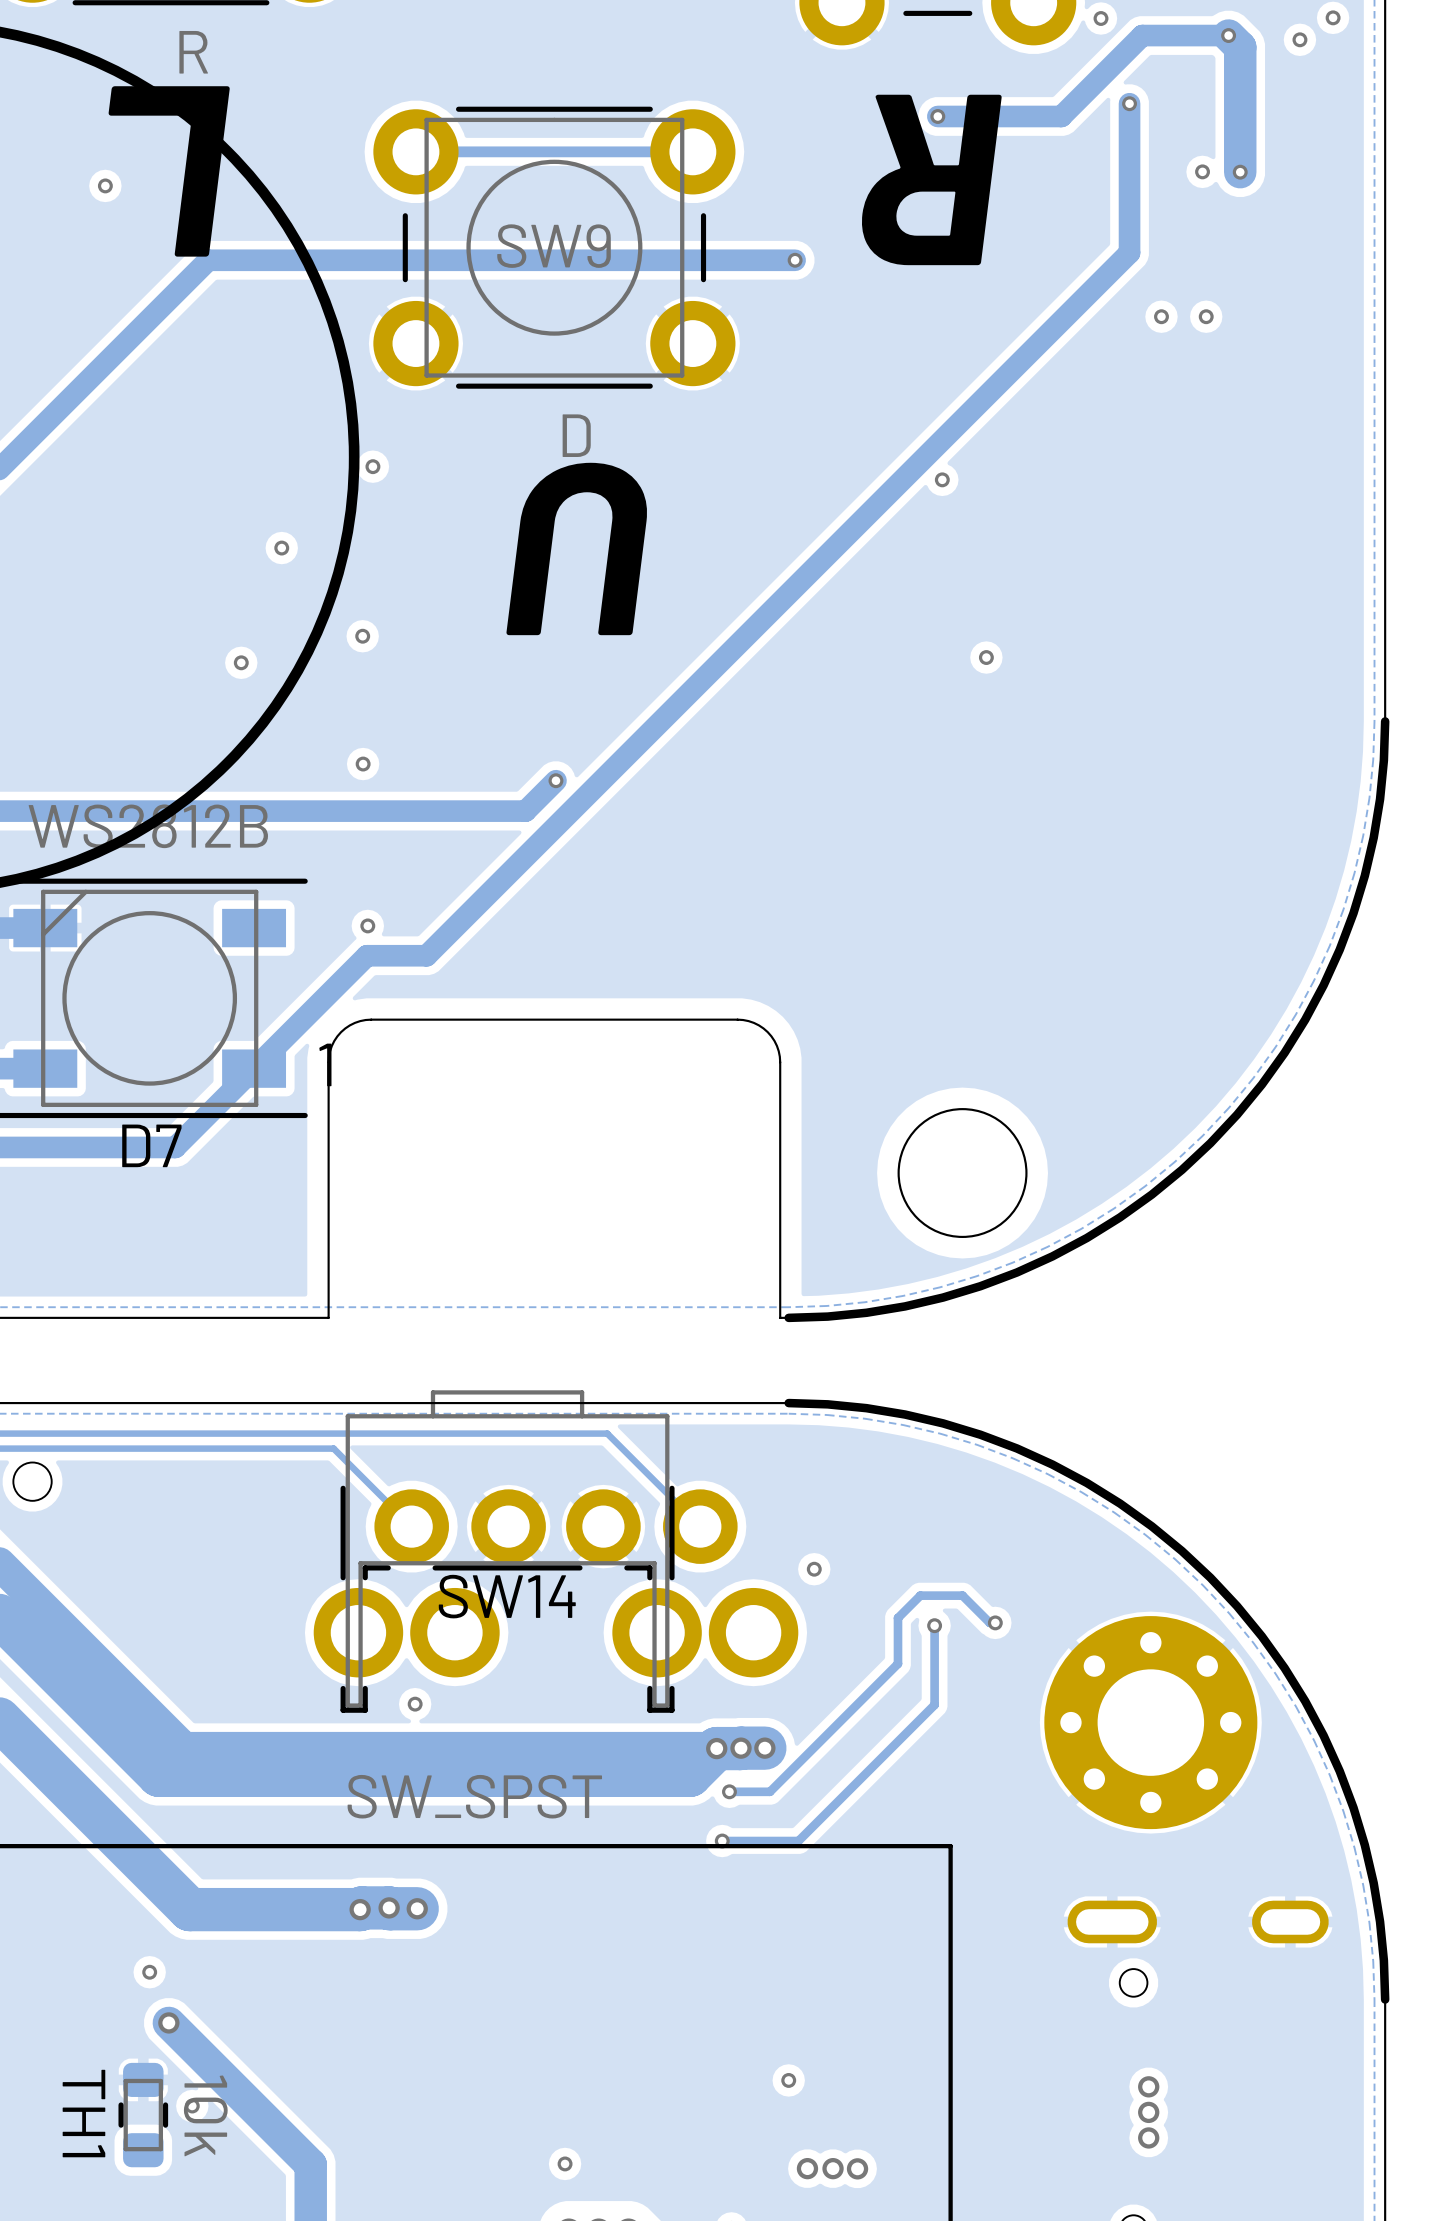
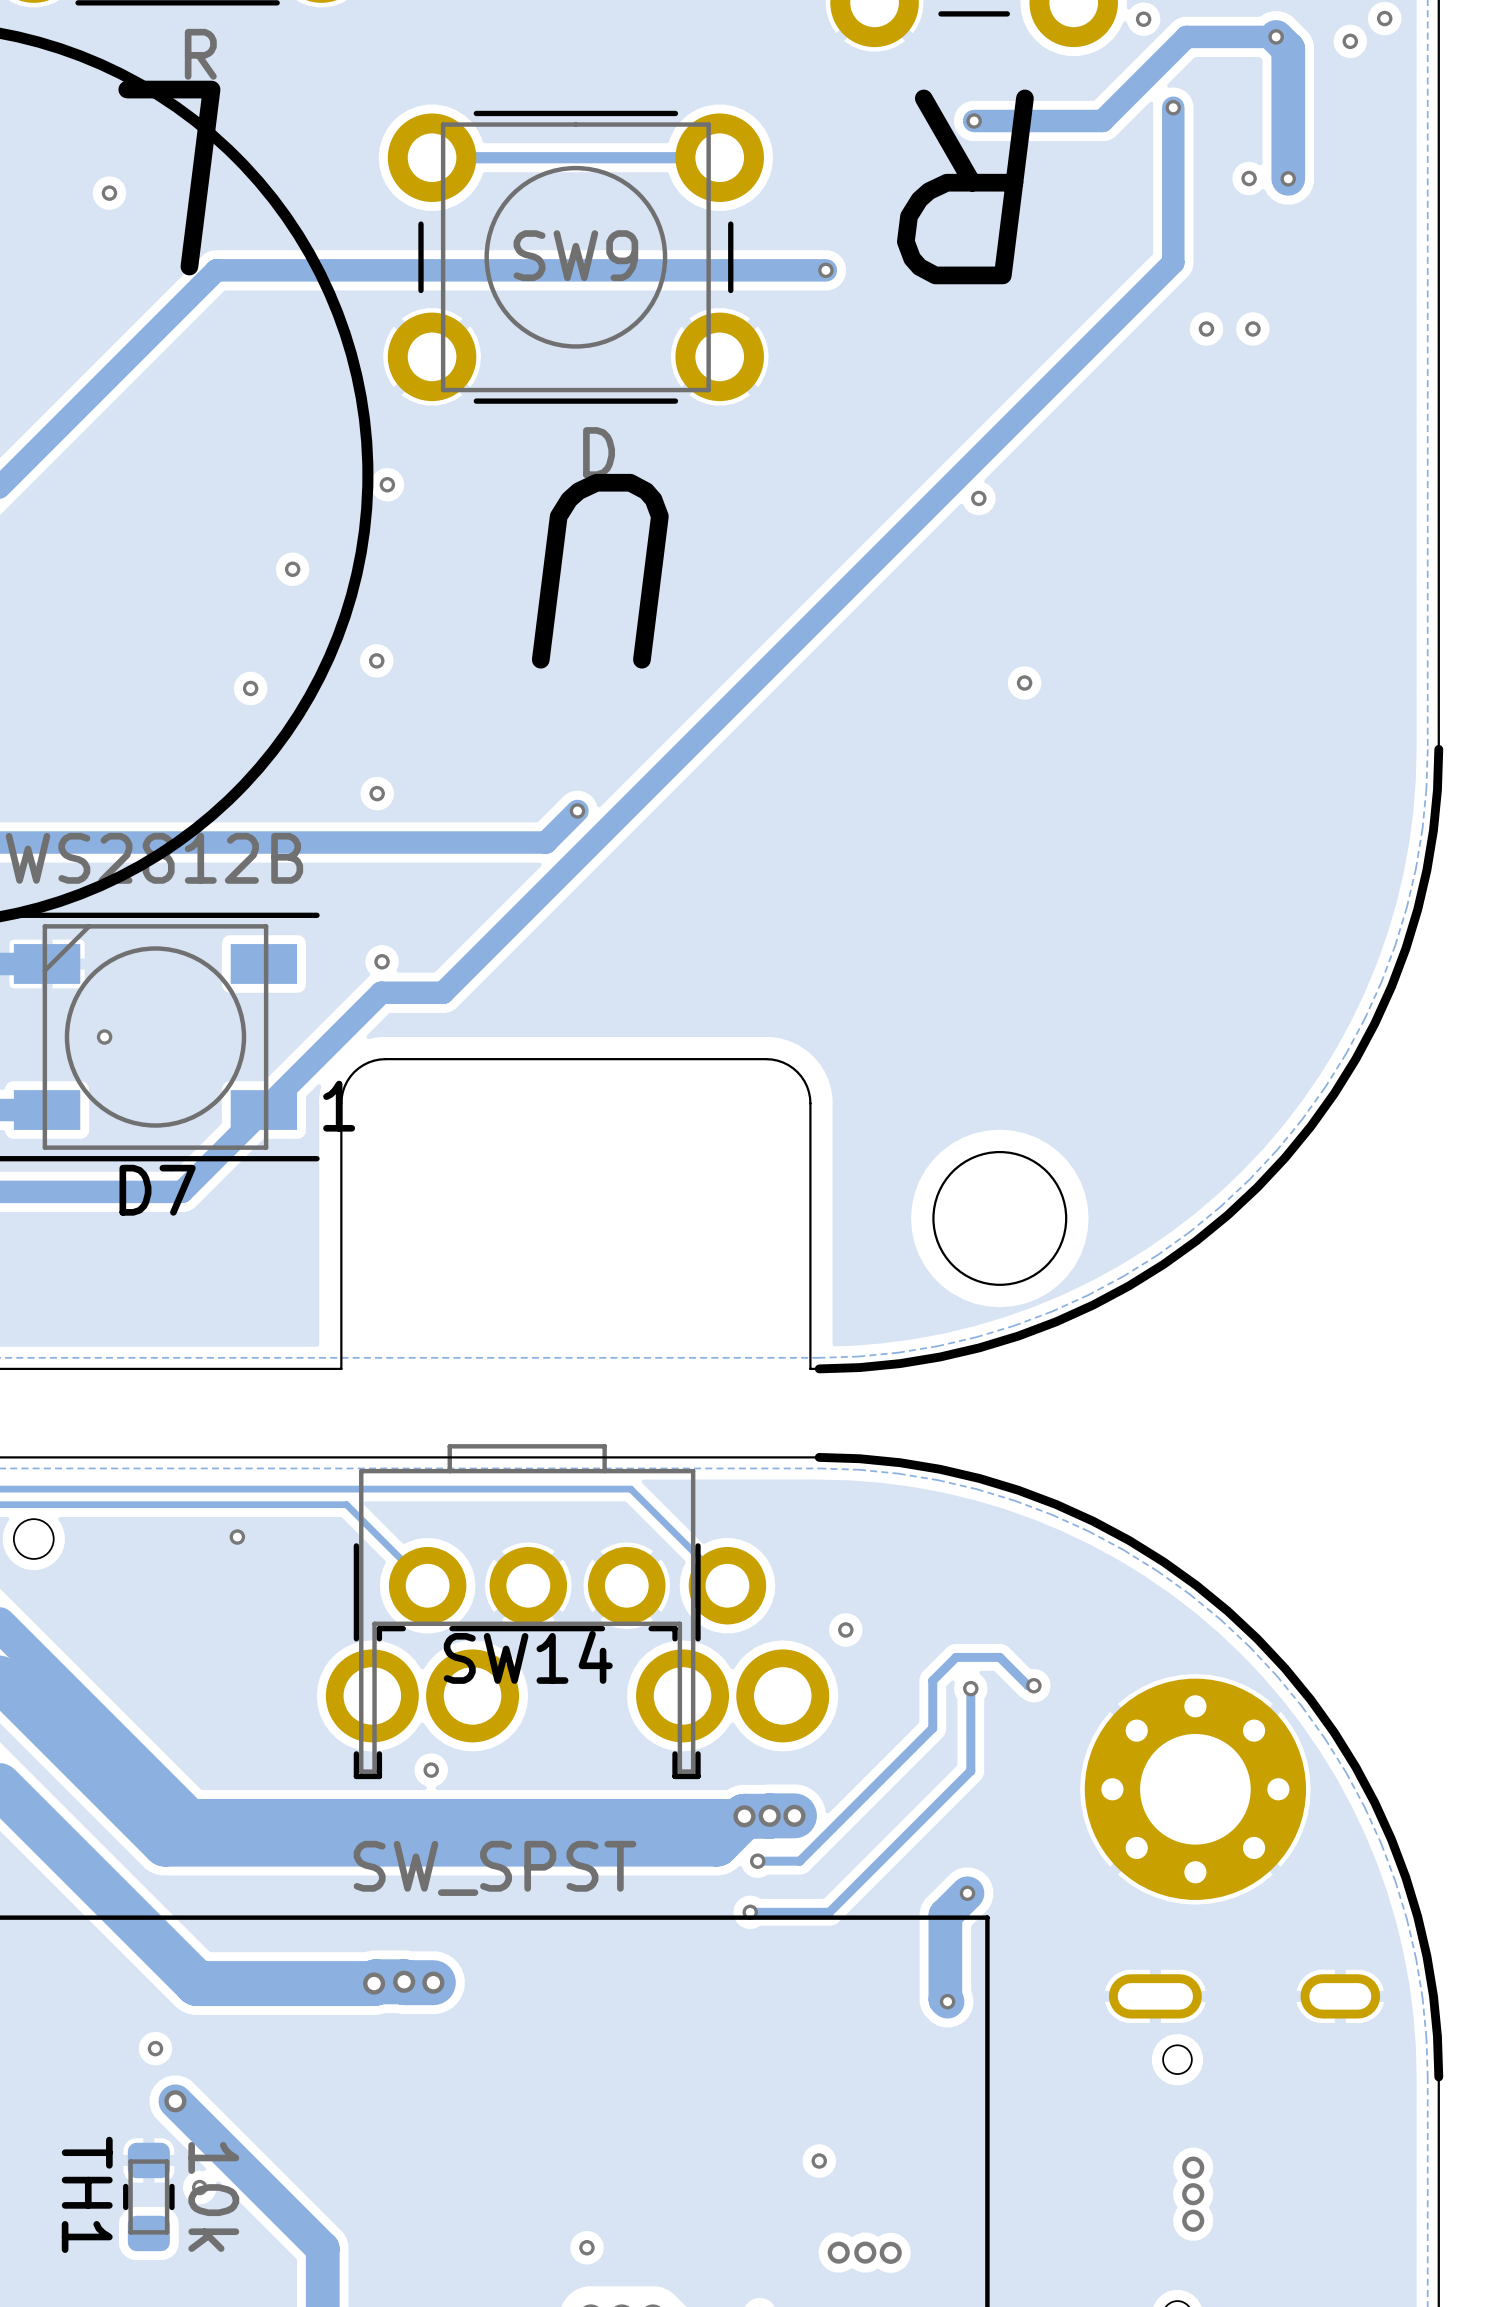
via: none -> (104, 1037)
via: none -> (237, 1537)
track: none -> (967, 1893) (945, 1915) (945, 1999) (947, 2001)
via: none -> (967, 1893)
via: none -> (947, 2001)

